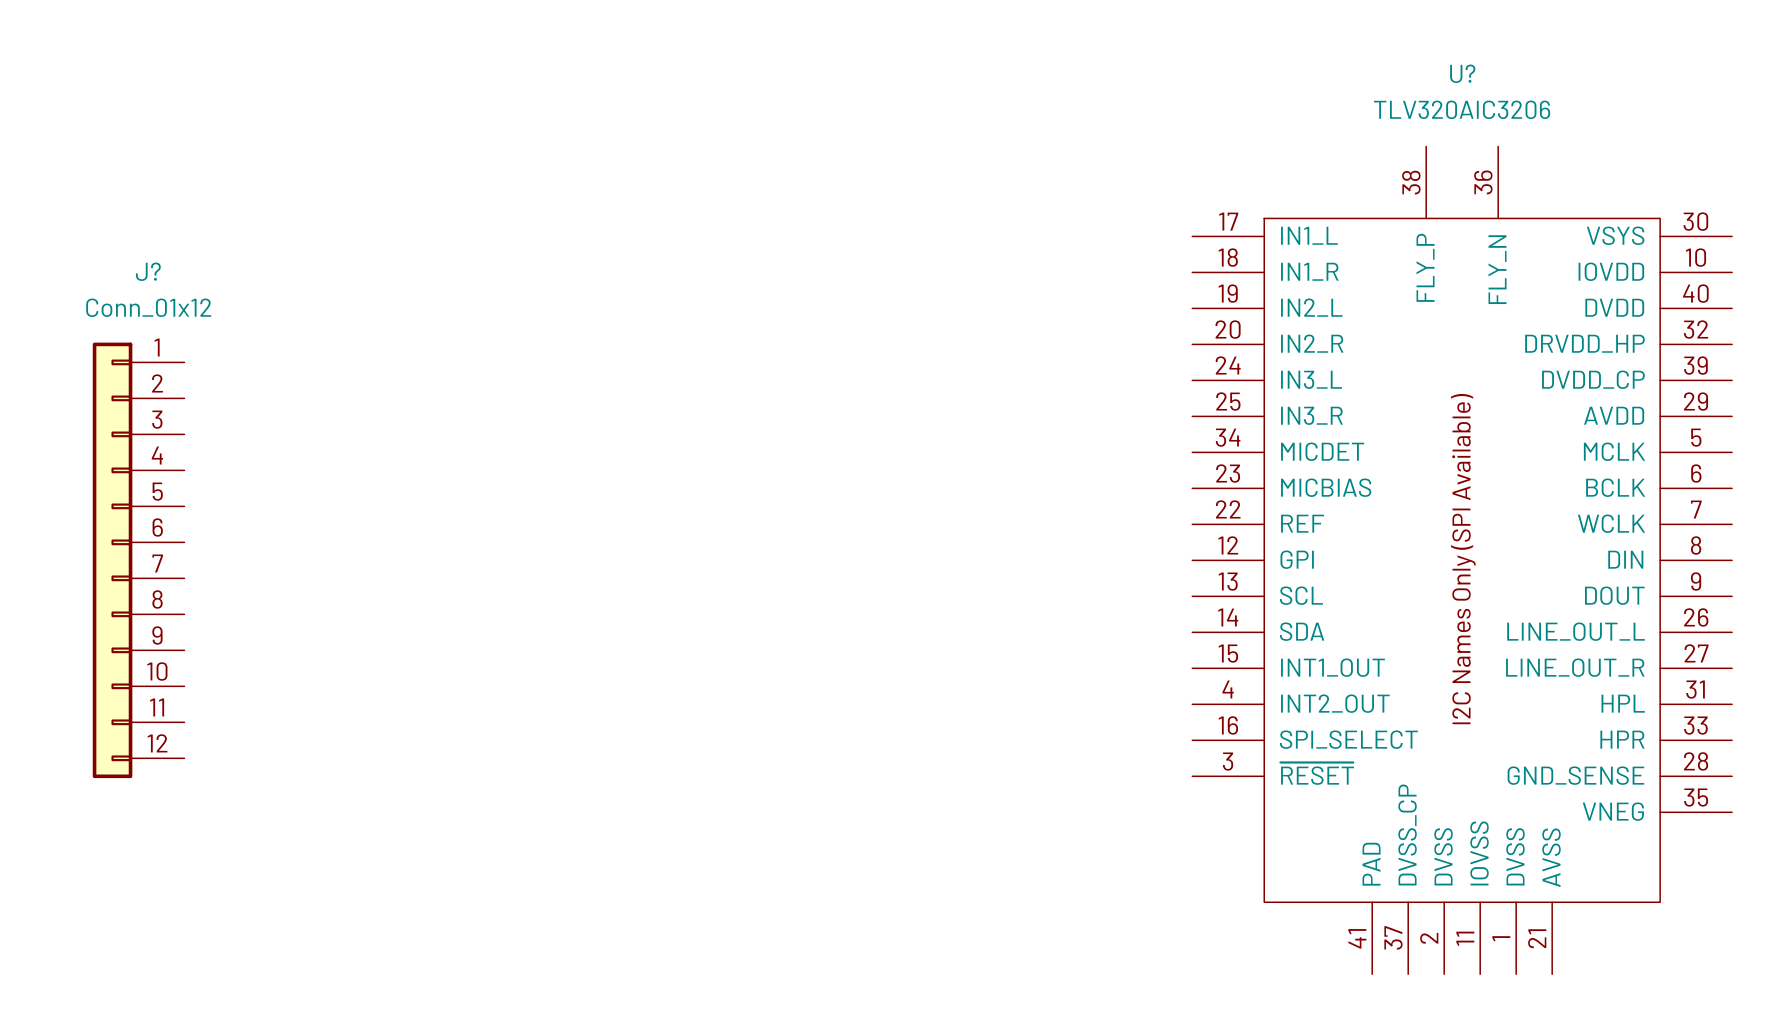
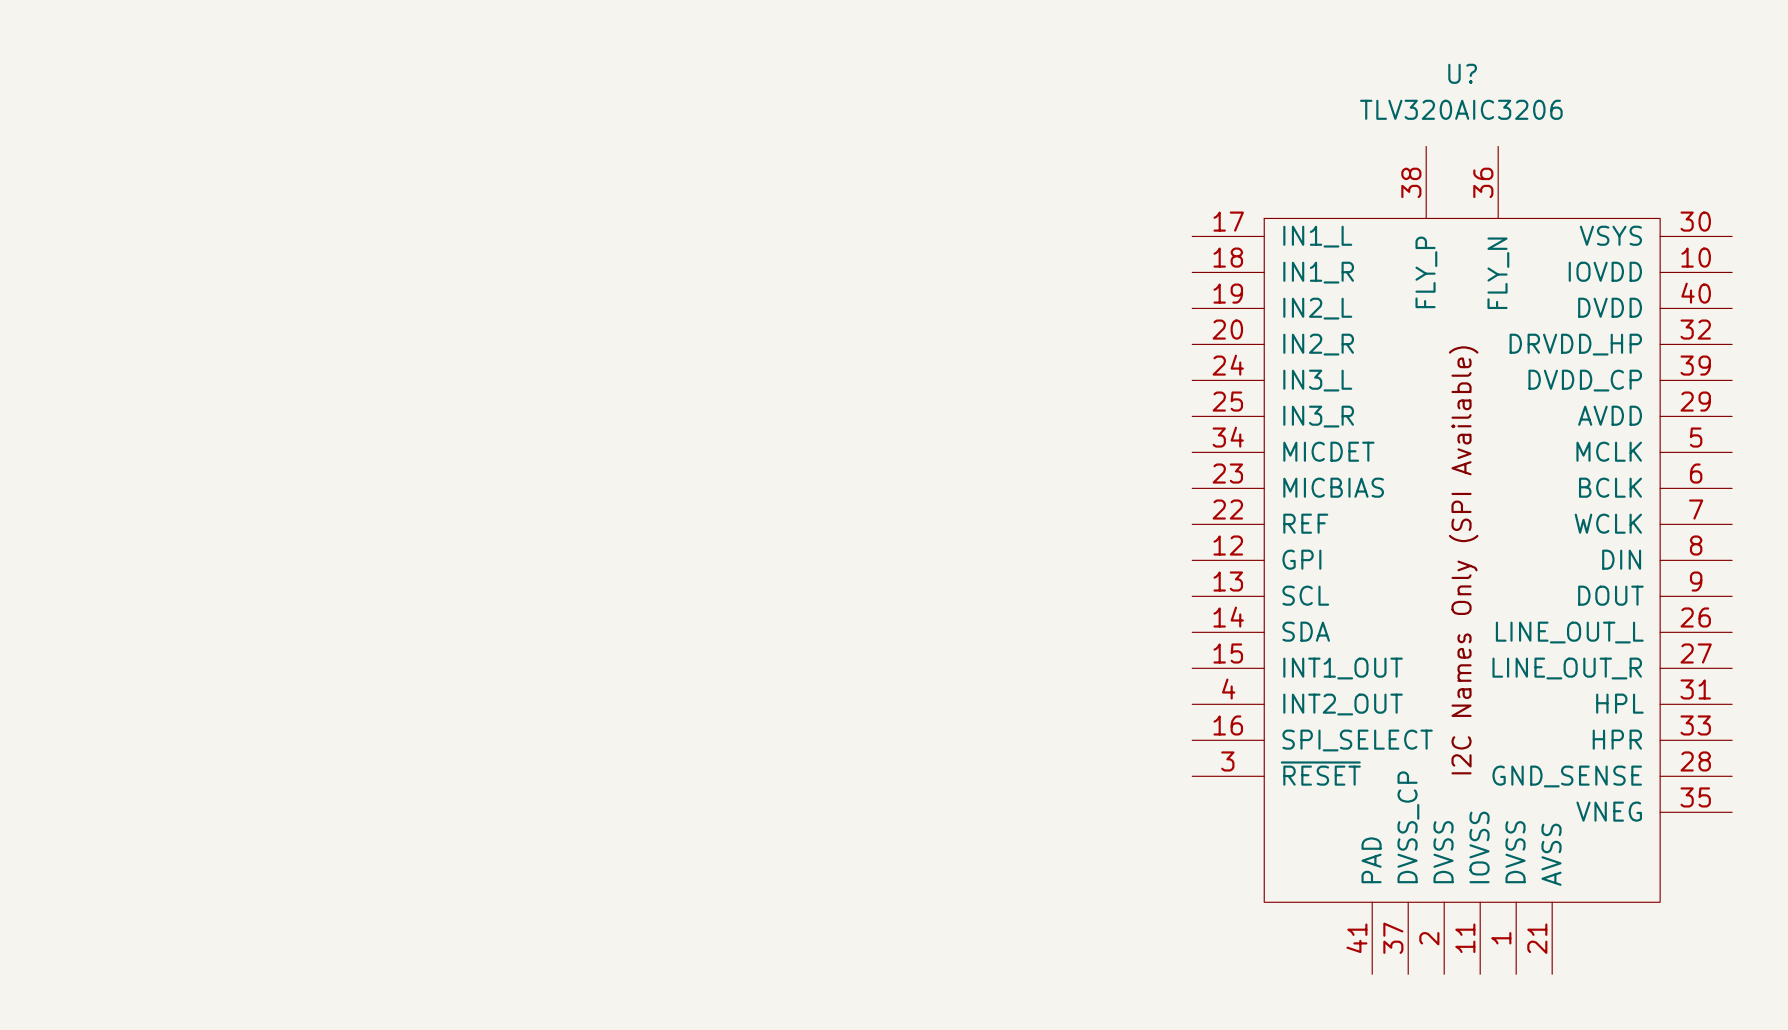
J?: Conn_01x12 (138, 560) -> none

